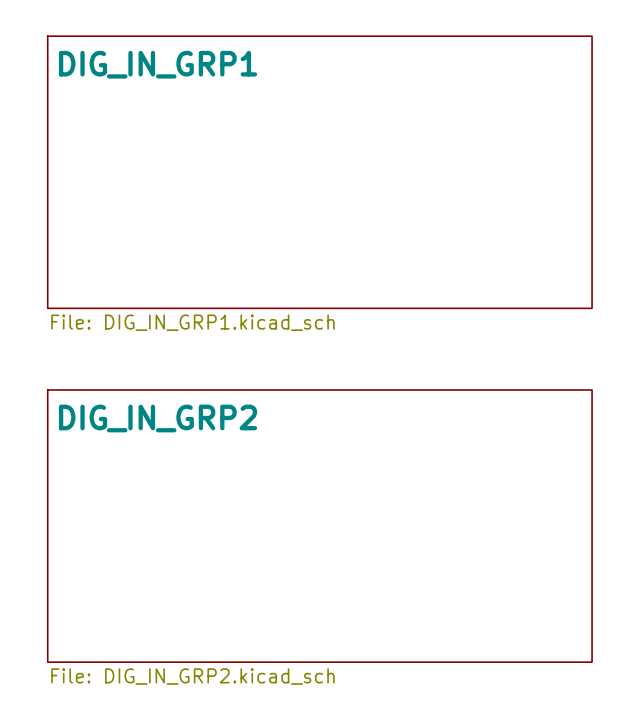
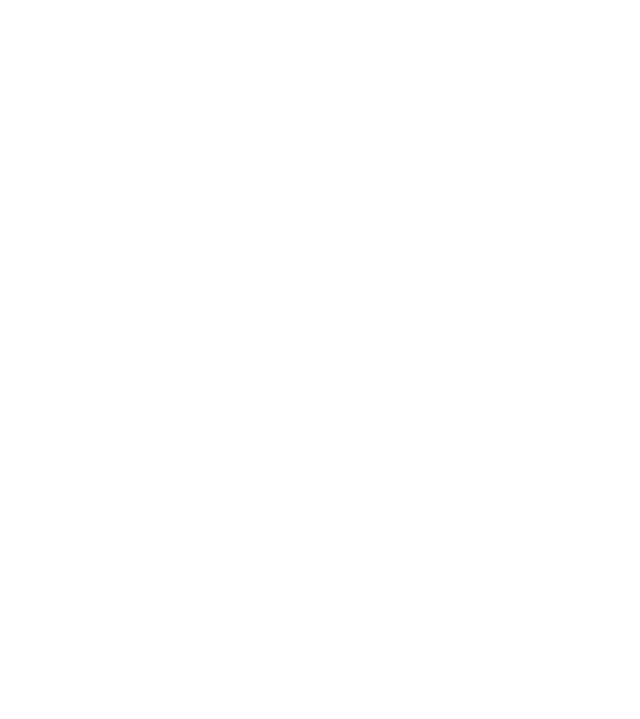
sheet DIG_IN_GRP1: File: DIG_IN_GRP1.kicad_sch (319, 172) -> none
sheet DIG_IN_GRP2: File: DIG_IN_GRP2.kicad_sch (319, 526) -> none

